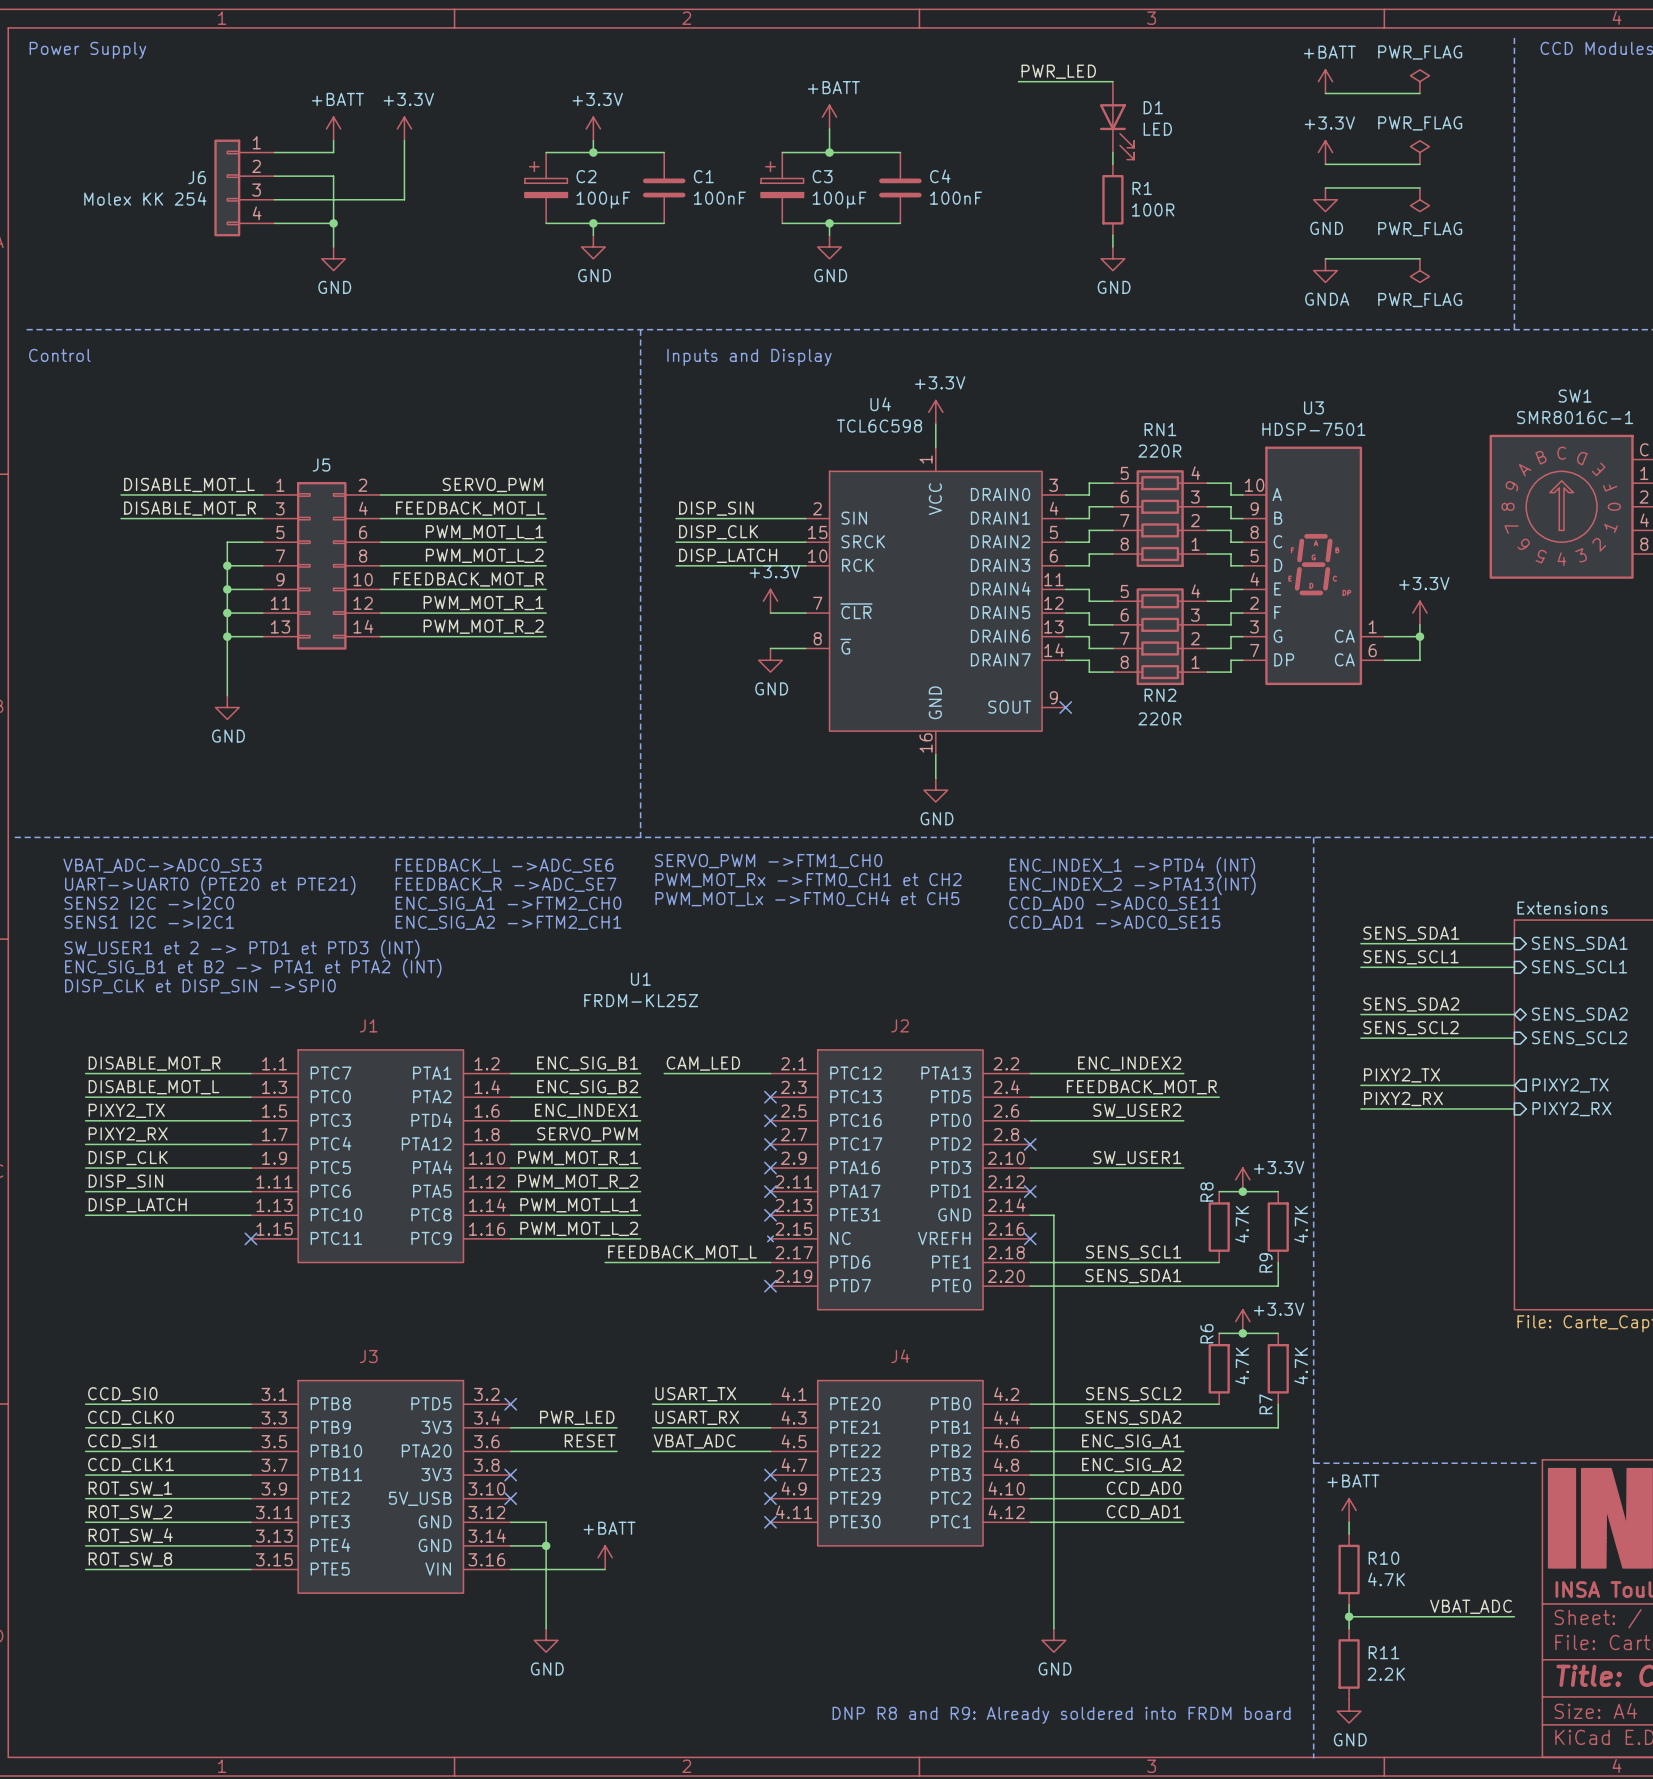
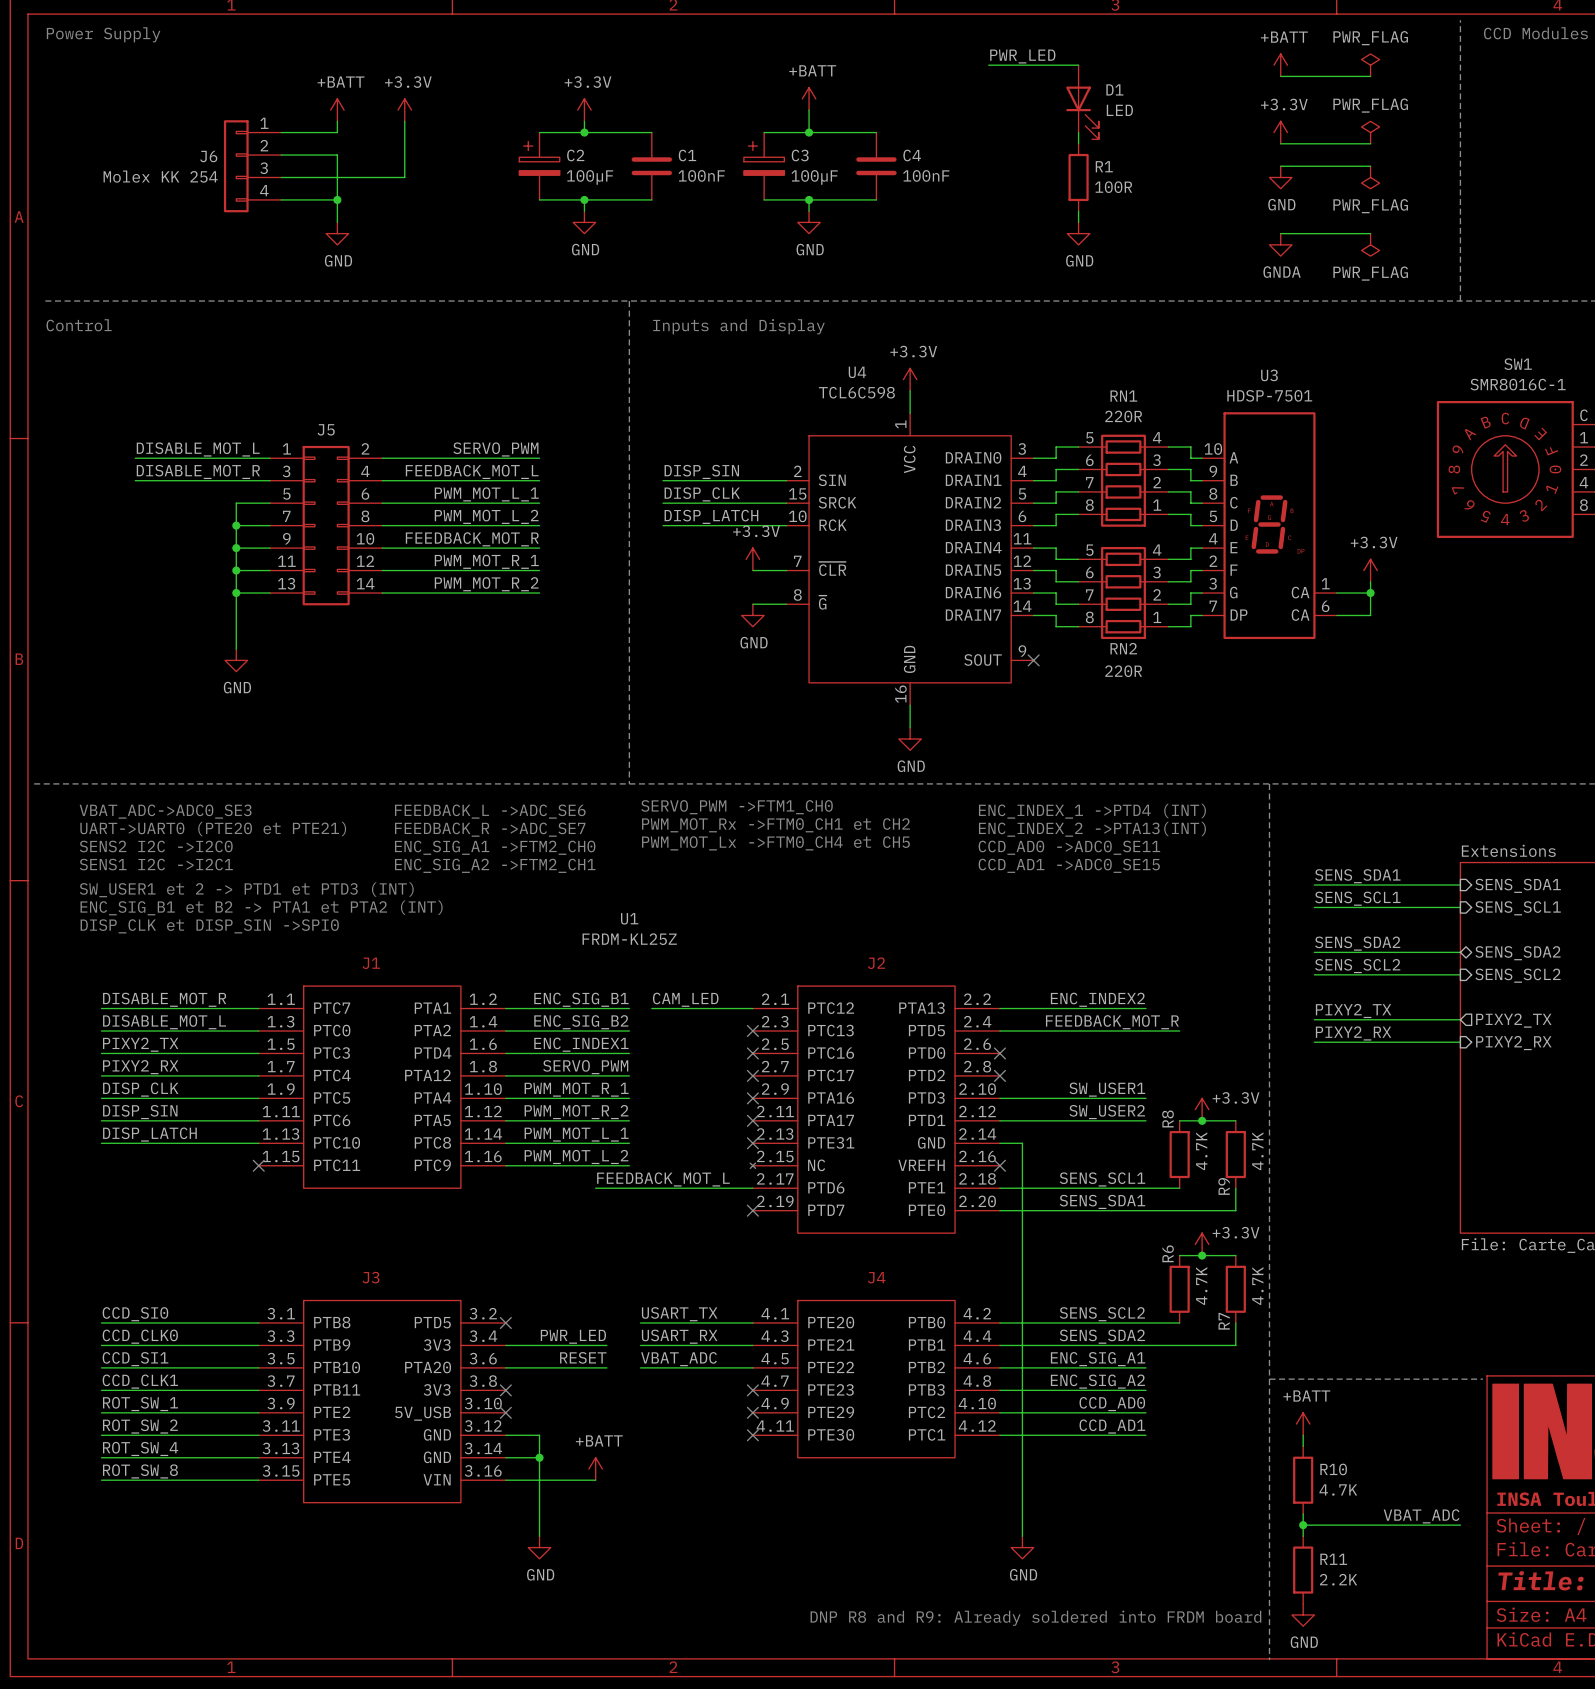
label position: SW_USER2 (1137, 1110) -> SW_USER2 (1107, 1112)
wire: (1030, 1120) (1183, 1120) -> (999, 1120) (1145, 1120)
no-connect mark: none -> (999, 1053)
no-connect mark: (1030, 1191) -> none

